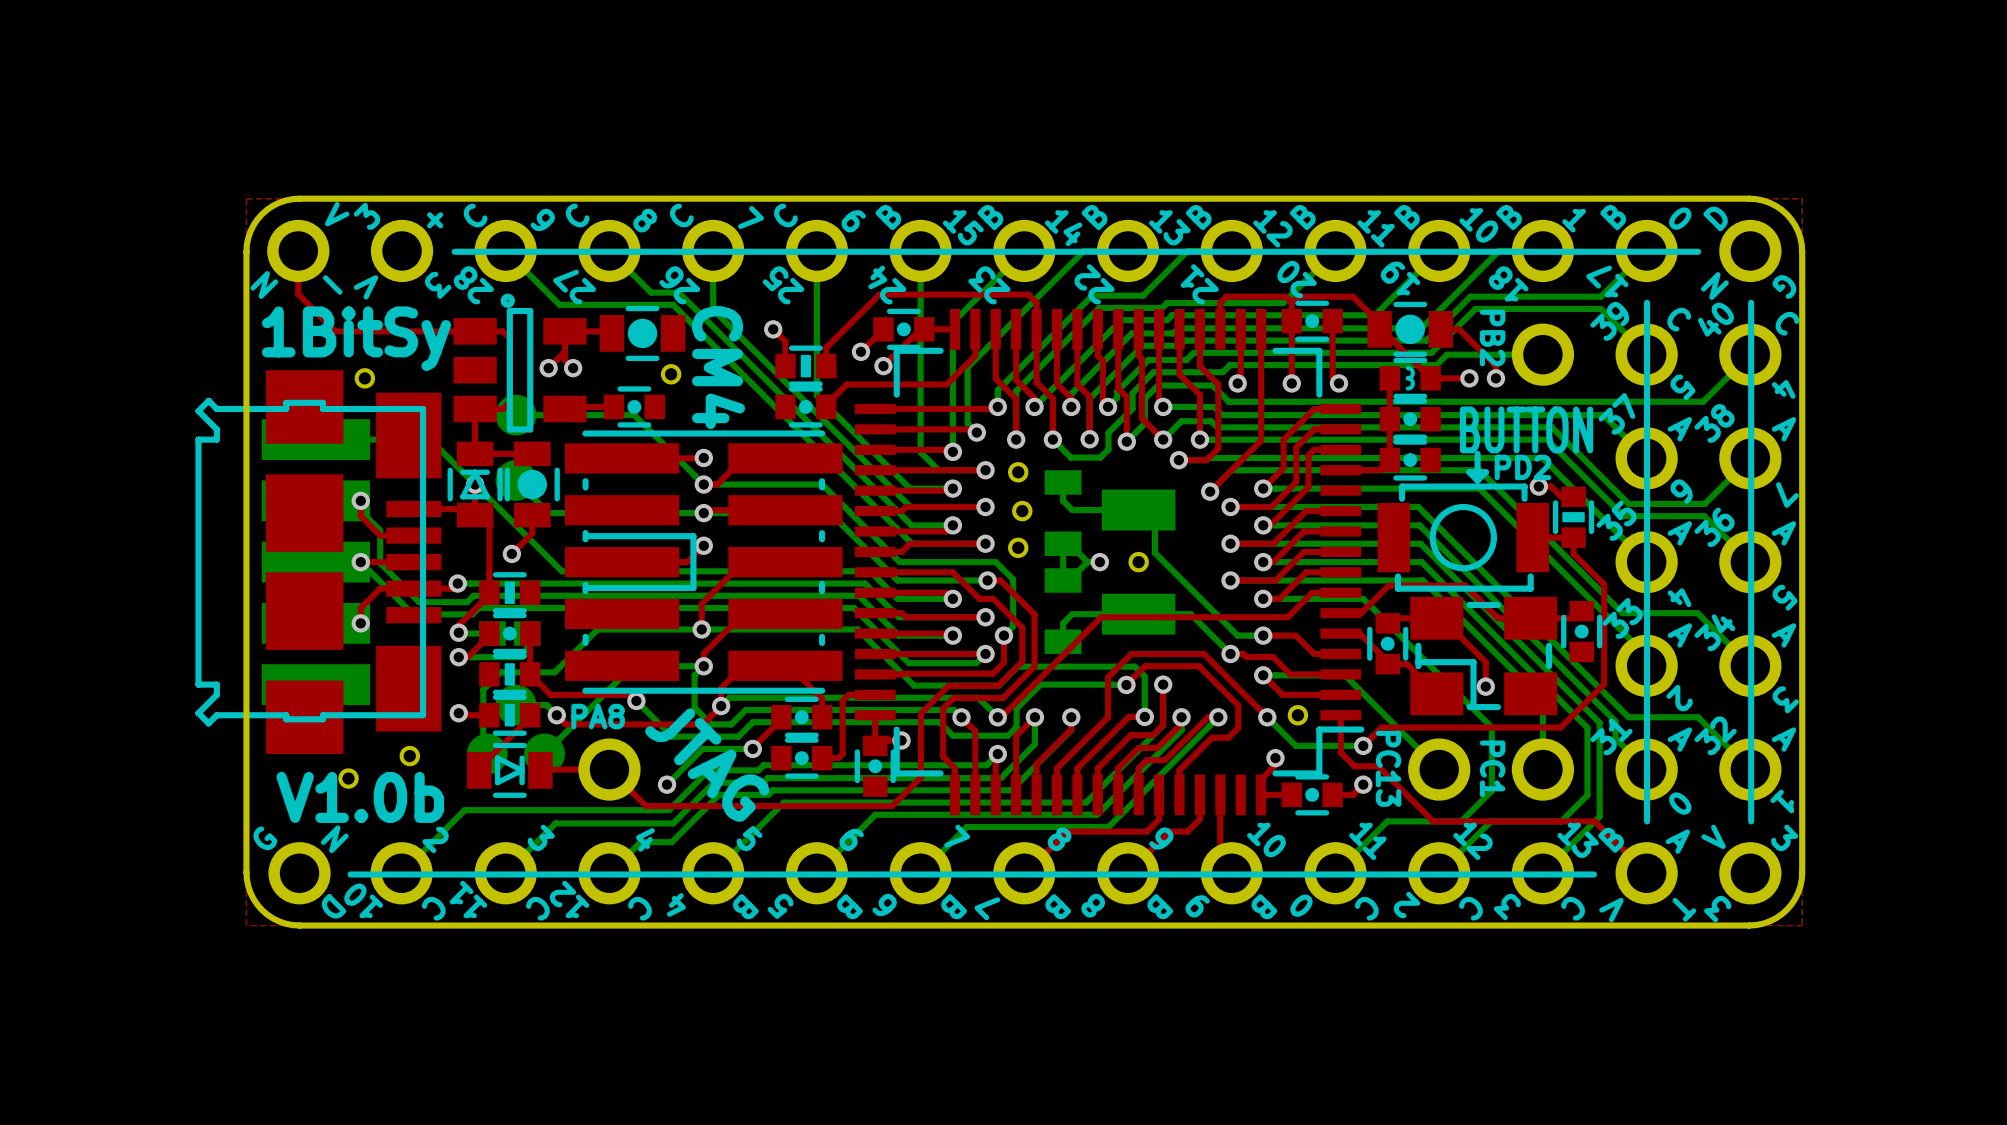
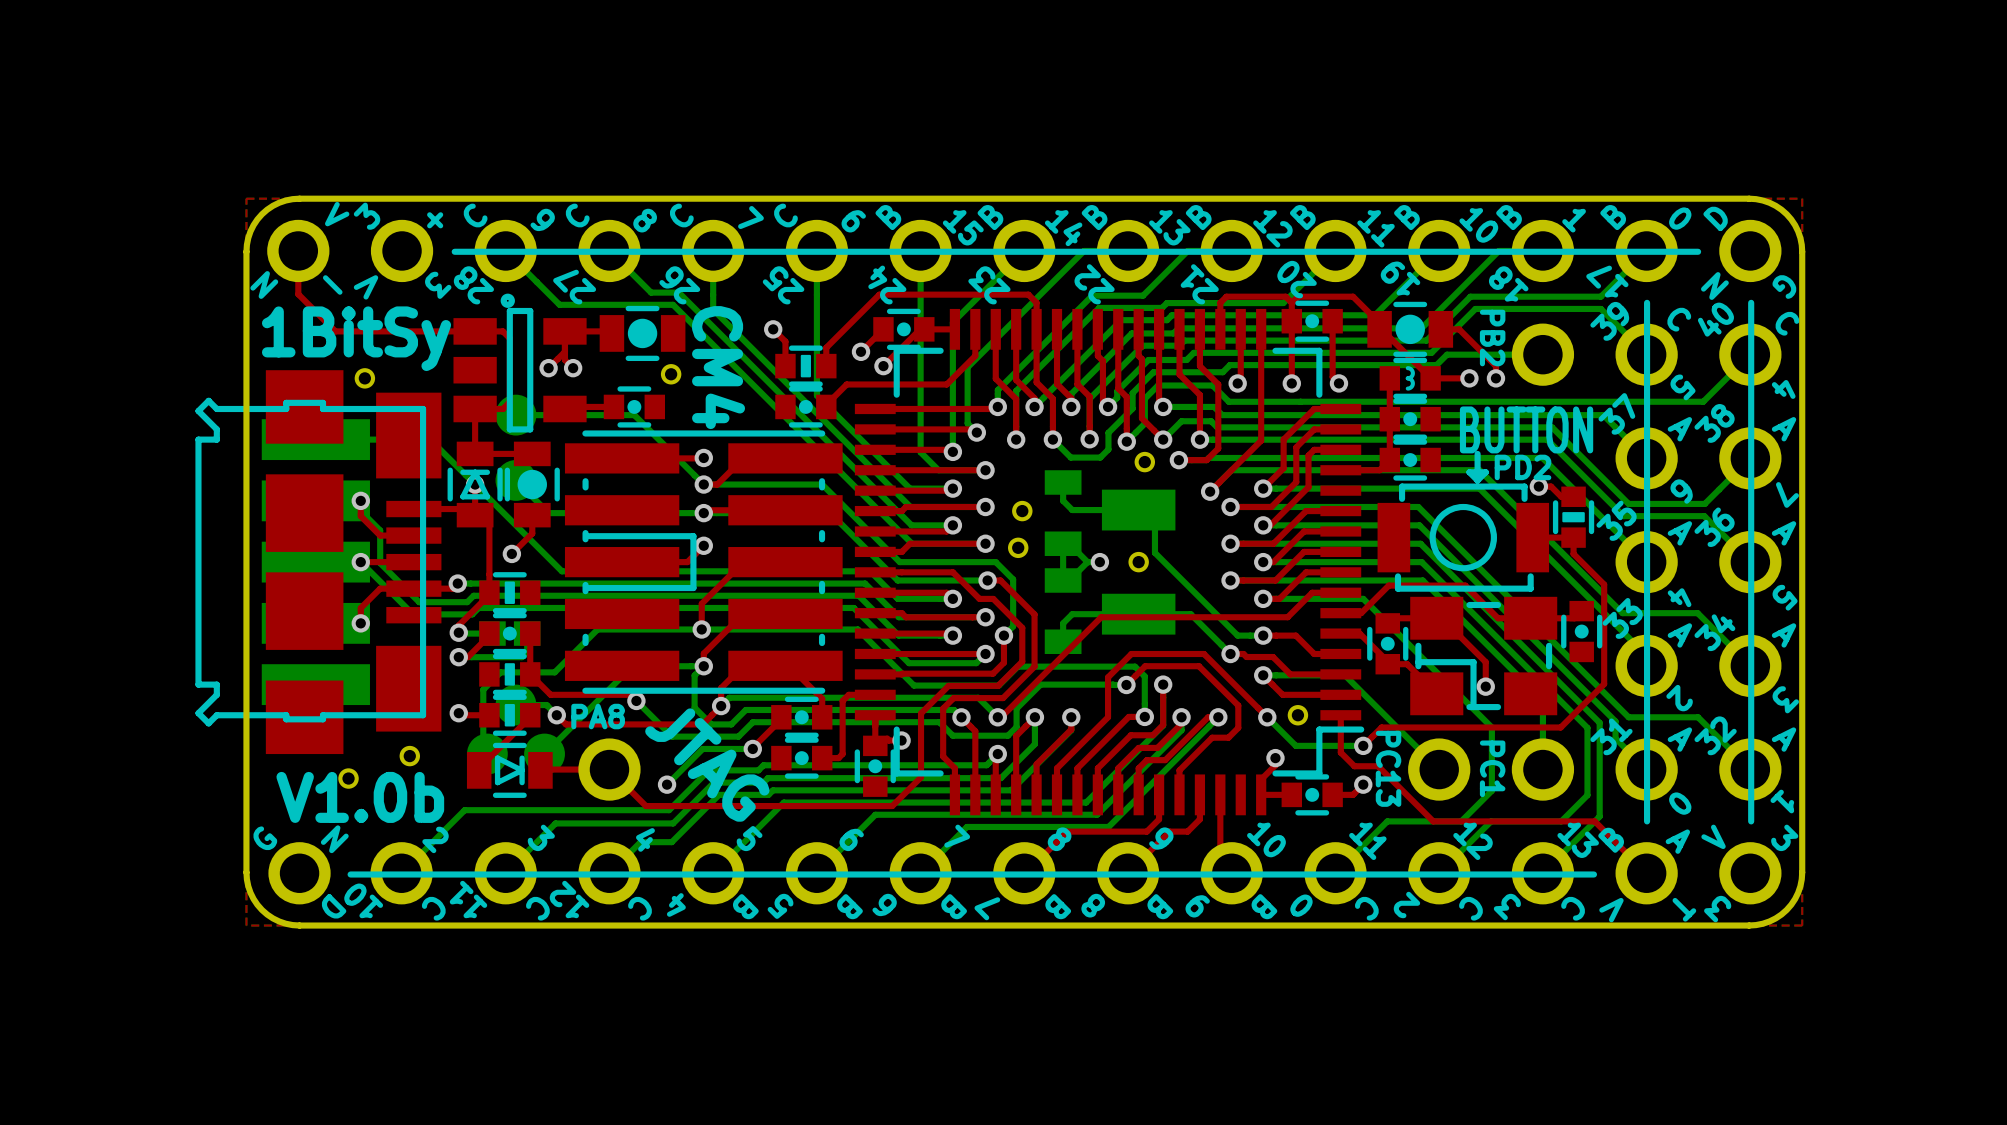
part position: (1018, 472) -> (1144, 462)

